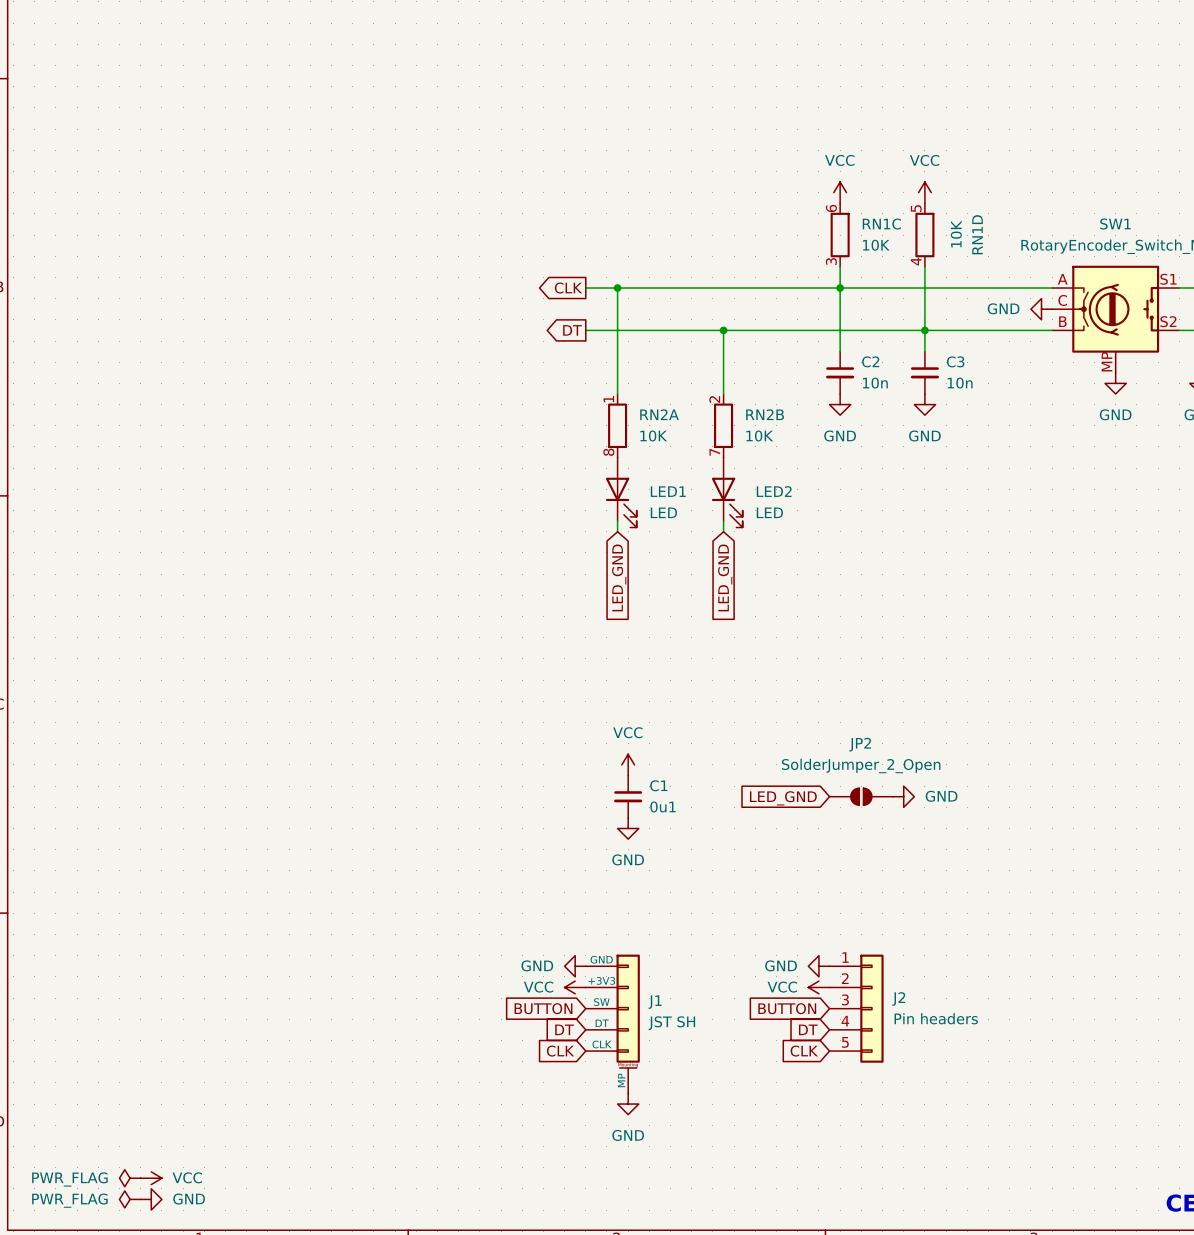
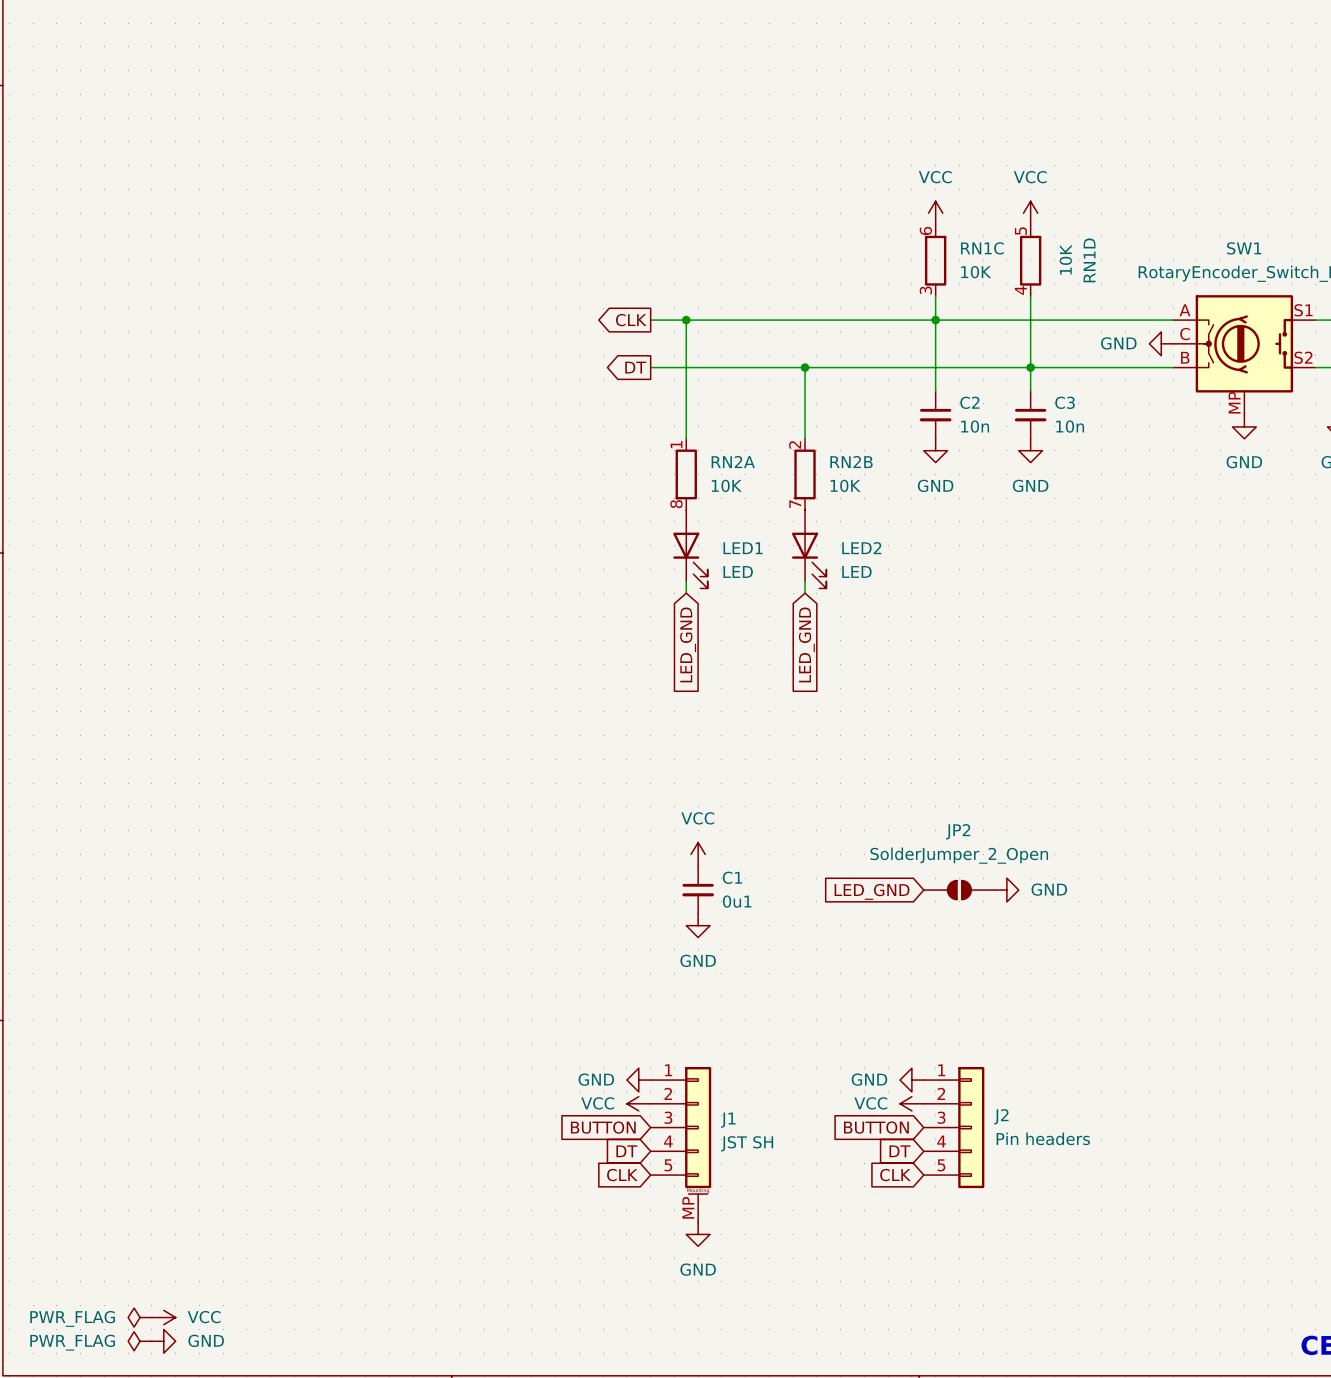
J1 symbol: [585, 954, 640, 1094] -> [650, 1066, 712, 1223]

